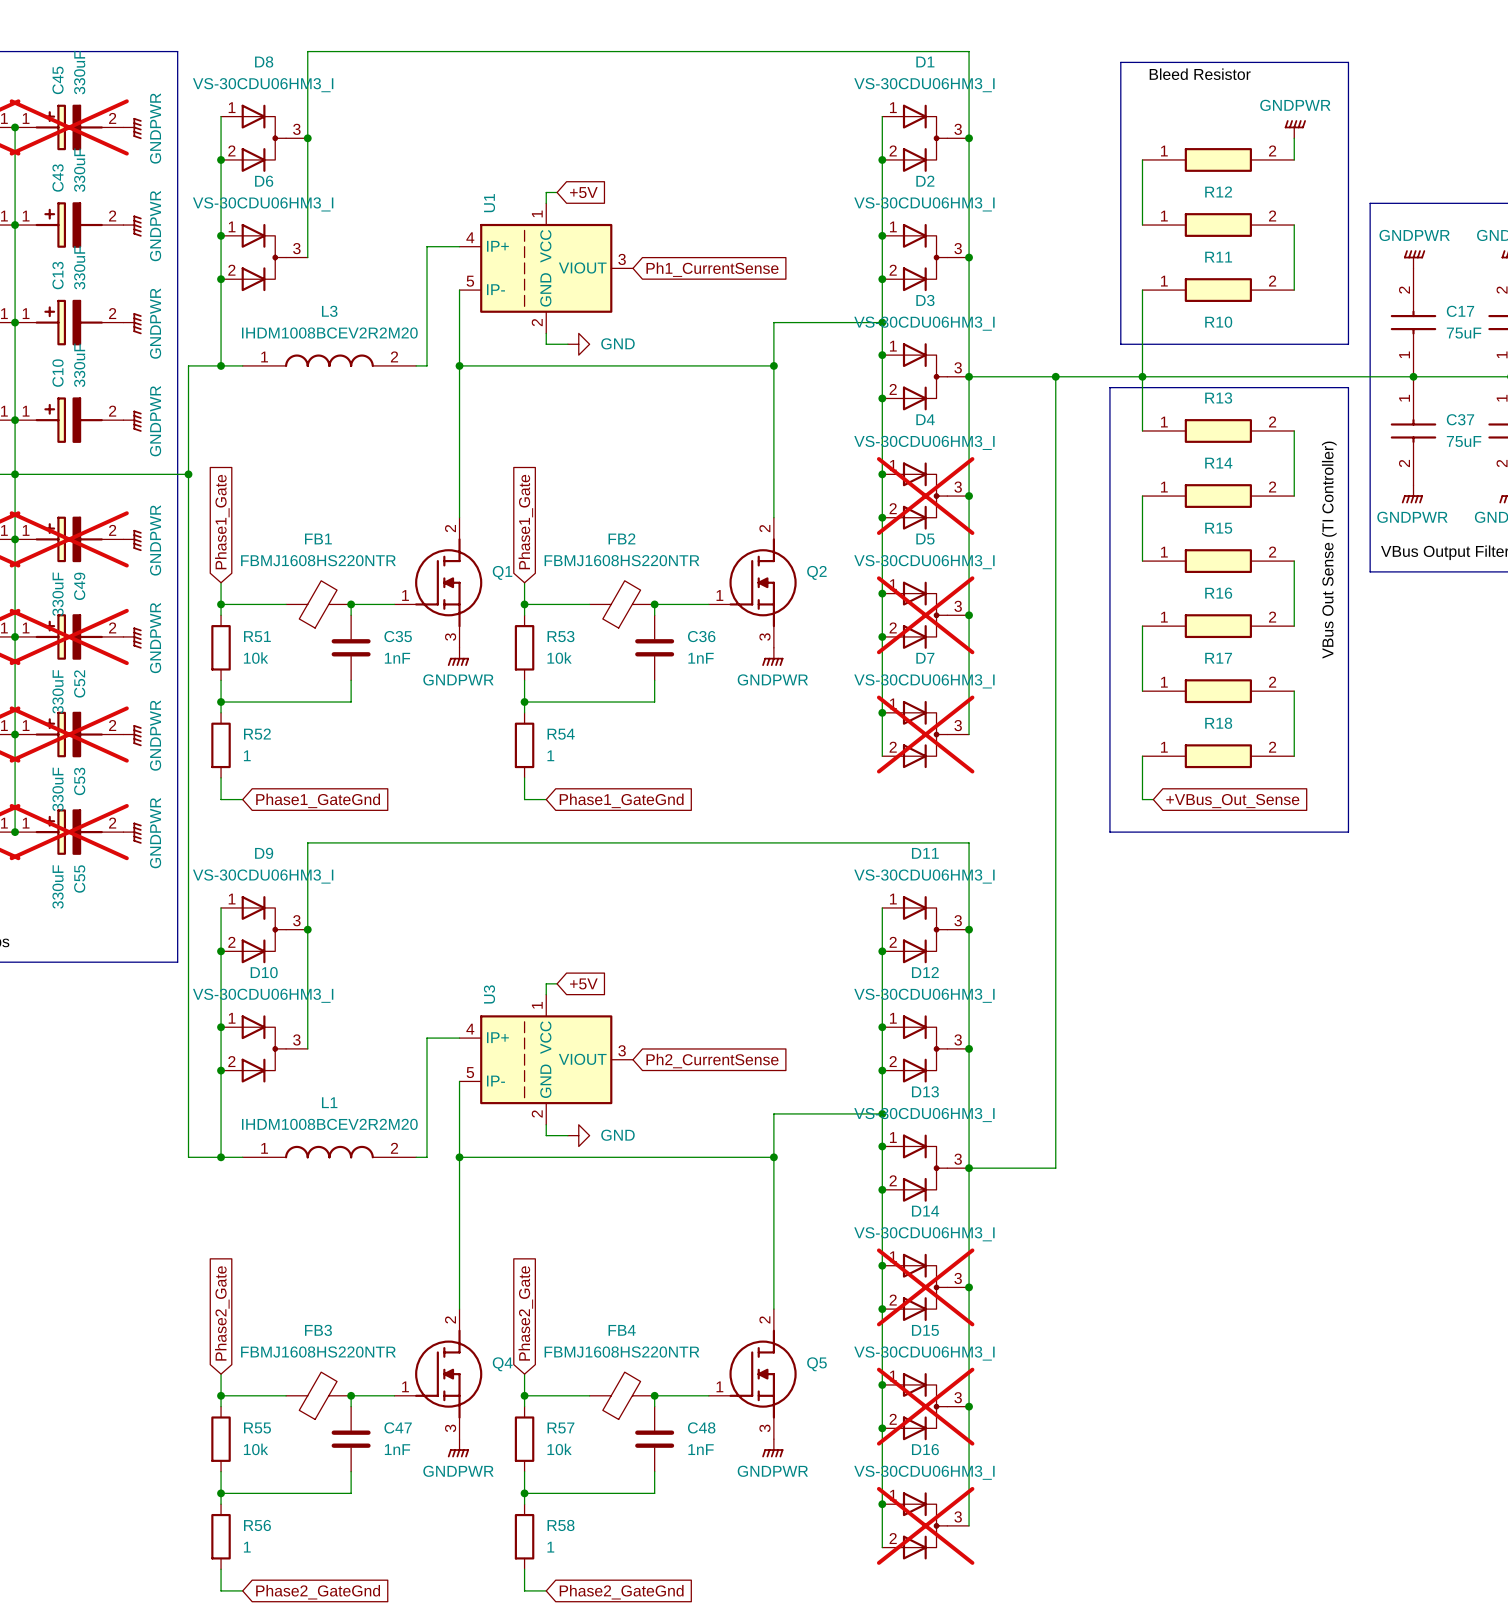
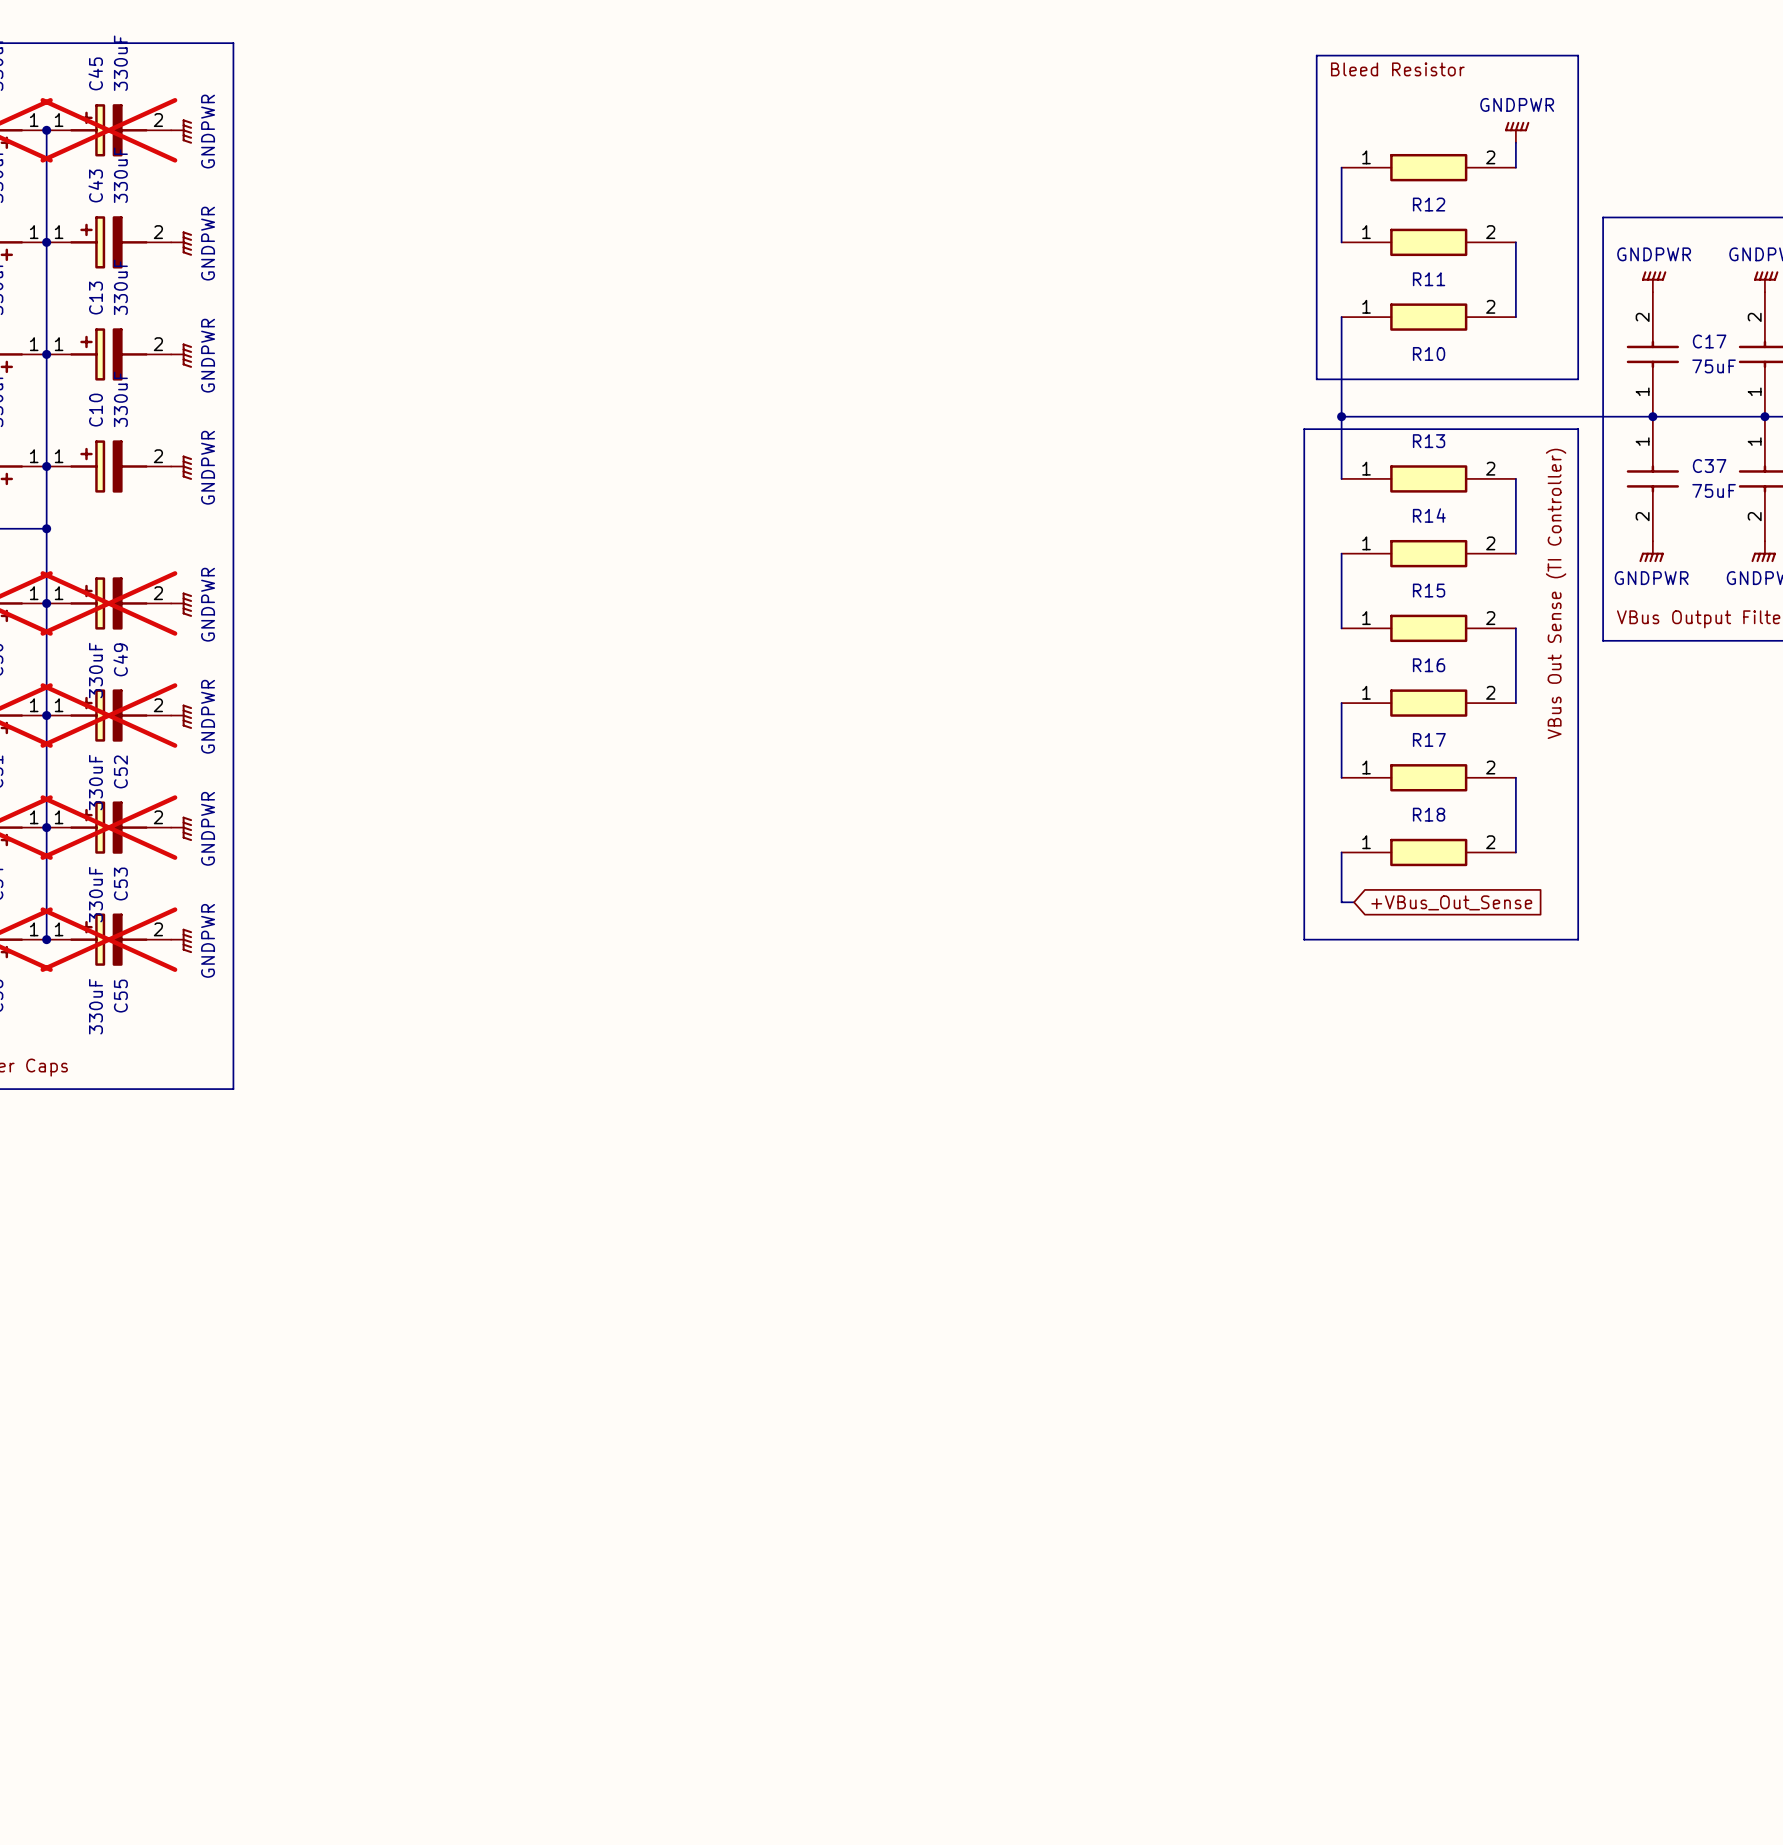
wire: (221, 116) (221, 365) -> none
wire: (882, 116) (882, 756) -> none
D8: VS-30CDU06HM3_I (264, 138) -> none
junction: (307, 138) -> none
D1: VS-30CDU06HM3_I (925, 138) -> none
junction: (969, 138) -> none
junction: (221, 159) -> none
junction: (882, 159) -> none
wire: (557, 192) (546, 192) (546, 203) -> none
global label: +5V (583, 192) -> none
junction: (221, 235) -> none
junction: (882, 235) -> none
wire: (459, 246) (427, 246) (427, 365) (416, 365) -> none
D6: VS-30CDU06HM3_I (264, 257) -> none
wire: (307, 257) (307, 51) (969, 51) (969, 734) -> none
D2: VS-30CDU06HM3_I (925, 257) -> none
junction: (969, 257) -> none
U1: (546, 268) -> none
global label: Ph1_CurrentSense (712, 269) -> none
junction: (221, 279) -> none
junction: (882, 279) -> none
wire: (459, 290) (459, 517) -> none
wire: (882, 322) (773, 322) (773, 517) -> none
junction: (882, 322) -> none
wire: (546, 333) (546, 344) (567, 344) -> none
power symbol: GND (578, 344) -> none
junction: (882, 355) -> none
L3: IHDM1008BCEV2R2M20 (329, 360) -> none
junction: (221, 365) -> none
wire: (242, 365) (188, 365) (188, 1157) (242, 1157) -> none
wire: (459, 365) (773, 365) -> none
junction: (459, 365) -> none
junction: (773, 365) -> none
D3: VS-30CDU06HM3_I (925, 376) -> none
wire: (969, 376) (1142, 376) -> none
junction: (969, 376) -> none
wire: (1055, 376) (1055, 1168) (969, 1168) -> none
junction: (1055, 376) -> none
junction: (882, 398) -> none
wire: (15, 474) (188, 474) -> none
junction: (188, 474) -> none
junction: (882, 474) -> none
D4: VS-30CDU06HM3_I (925, 496) -> none
junction: (969, 496) -> none
junction: (882, 517) -> none
global label: Phase1_Gate (222, 522) -> none
global label: Phase1_Gate (525, 522) -> none
wire: (221, 582) (221, 615) -> none
Q1: (438, 582) -> none
wire: (524, 582) (524, 615) -> none
Q2: (752, 582) -> none
junction: (882, 593) -> none
wire: (221, 604) (286, 604) -> none
junction: (221, 604) -> none
FB1: FBMJ1608HS220NTR (318, 604) -> none
junction: (351, 604) -> none
wire: (394, 604) (351, 604) (351, 615) -> none
wire: (524, 604) (589, 604) -> none
junction: (524, 604) -> none
FB2: FBMJ1608HS220NTR (622, 604) -> none
junction: (654, 604) -> none
wire: (708, 604) (654, 604) (654, 615) -> none
D5: VS-30CDU06HM3_I (925, 615) -> none
junction: (969, 615) -> none
junction: (882, 636) -> none
R51: 10k (221, 647) -> none
C35: 1nF (351, 647) -> none
R53: 10k (524, 647) -> none
C36: 1nF (654, 647) -> none
power symbol: GNDPWR (458, 656) -> none
power symbol: GNDPWR (772, 656) -> none
wire: (221, 680) (221, 712) -> none
wire: (351, 680) (351, 702) (221, 702) -> none
wire: (524, 680) (524, 712) -> none
wire: (654, 680) (654, 702) (524, 702) -> none
junction: (221, 702) -> none
junction: (524, 702) -> none
junction: (882, 712) -> none
D7: VS-30CDU06HM3_I (925, 734) -> none
R52: 1 (221, 745) -> none
R54: 1 (524, 745) -> none
wire: (221, 777) (221, 799) (242, 799) -> none
wire: (524, 777) (524, 799) (546, 799) -> none
global label: Phase1_GateGnd (318, 800) -> none
global label: Phase1_GateGnd (621, 800) -> none
wire: (221, 907) (221, 1157) -> none
wire: (882, 907) (882, 1547) -> none
D9: VS-30CDU06HM3_I (264, 929) -> none
junction: (307, 929) -> none
D11: VS-30CDU06HM3_I (925, 929) -> none
junction: (969, 929) -> none
junction: (221, 951) -> none
junction: (882, 951) -> none
wire: (557, 983) (546, 983) (546, 994) -> none
global label: +5V (583, 983) -> none
junction: (221, 1027) -> none
junction: (882, 1027) -> none
wire: (459, 1038) (427, 1038) (427, 1157) (416, 1157) -> none
D10: VS-30CDU06HM3_I (264, 1048) -> none
wire: (307, 1048) (307, 842) (969, 842) (969, 1525) -> none
D12: VS-30CDU06HM3_I (925, 1048) -> none
junction: (969, 1048) -> none
U3: (546, 1059) -> none
global label: Ph2_CurrentSense (712, 1061) -> none
junction: (221, 1070) -> none
junction: (882, 1070) -> none
wire: (459, 1081) (459, 1309) -> none
wire: (882, 1113) (773, 1113) (773, 1309) -> none
junction: (882, 1113) -> none
wire: (546, 1124) (546, 1135) (567, 1135) -> none
power symbol: GND (578, 1135) -> none
junction: (882, 1146) -> none
L1: IHDM1008BCEV2R2M20 (329, 1152) -> none
junction: (221, 1157) -> none
wire: (459, 1157) (773, 1157) -> none
junction: (459, 1157) -> none
junction: (773, 1157) -> none
D13: VS-30CDU06HM3_I (925, 1168) -> none
junction: (969, 1168) -> none
junction: (882, 1189) -> none
junction: (882, 1265) -> none
D14: VS-30CDU06HM3_I (925, 1287) -> none
junction: (969, 1287) -> none
junction: (882, 1309) -> none
global label: Phase2_Gate (222, 1313) -> none
global label: Phase2_Gate (525, 1313) -> none
wire: (221, 1374) (221, 1406) -> none
Q4: (438, 1374) -> none
wire: (524, 1374) (524, 1406) -> none
Q5: (752, 1374) -> none
junction: (882, 1384) -> none
wire: (221, 1395) (286, 1395) -> none
junction: (221, 1395) -> none
FB3: FBMJ1608HS220NTR (318, 1395) -> none
junction: (351, 1395) -> none
wire: (394, 1395) (351, 1395) (351, 1406) -> none
wire: (524, 1395) (589, 1395) -> none
junction: (524, 1395) -> none
FB4: FBMJ1608HS220NTR (622, 1395) -> none
junction: (654, 1395) -> none
wire: (708, 1395) (654, 1395) (654, 1406) -> none
D15: VS-30CDU06HM3_I (925, 1406) -> none
junction: (969, 1406) -> none
junction: (882, 1428) -> none
R55: 10k (221, 1439) -> none
C47: 1nF (351, 1439) -> none
R57: 10k (524, 1439) -> none
C48: 1nF (654, 1439) -> none
power symbol: GNDPWR (458, 1448) -> none
power symbol: GNDPWR (772, 1448) -> none
wire: (221, 1471) (221, 1504) -> none
wire: (351, 1471) (351, 1493) (221, 1493) -> none
wire: (524, 1471) (524, 1504) -> none
wire: (654, 1471) (654, 1493) (524, 1493) -> none
junction: (221, 1493) -> none
junction: (524, 1493) -> none
junction: (882, 1504) -> none
D16: VS-30CDU06HM3_I (925, 1525) -> none
R56: 1 (221, 1536) -> none
R58: 1 (524, 1536) -> none
wire: (221, 1569) (221, 1590) (242, 1590) -> none
wire: (524, 1569) (524, 1590) (546, 1590) -> none
global label: Phase2_GateGnd (318, 1592) -> none
global label: Phase2_GateGnd (621, 1592) -> none

